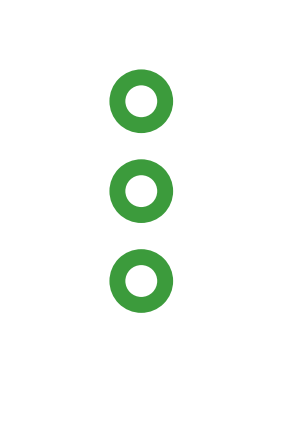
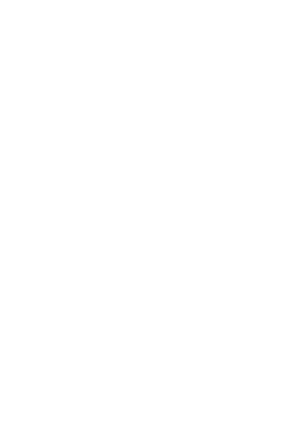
part: (141, 191) -> none

